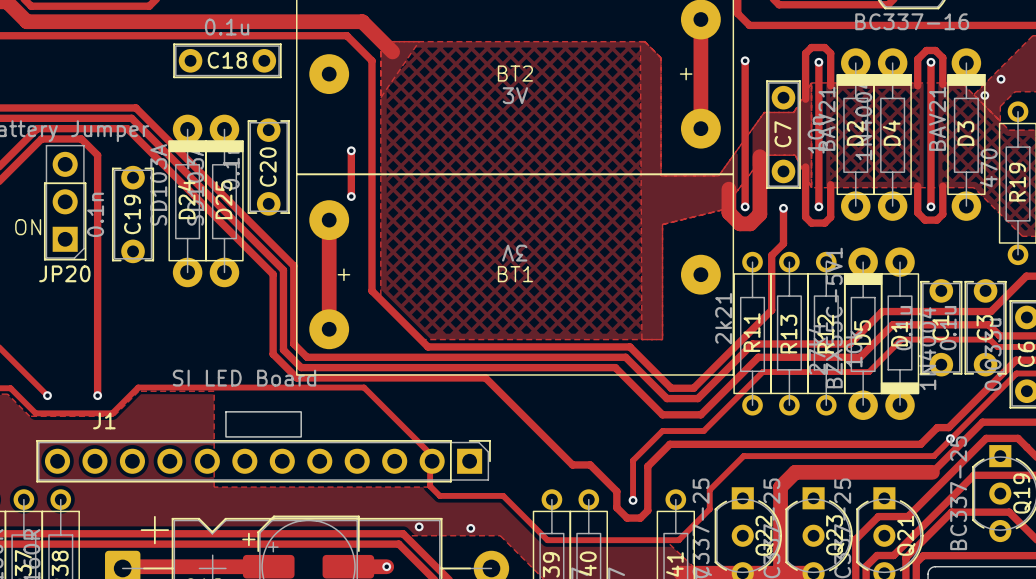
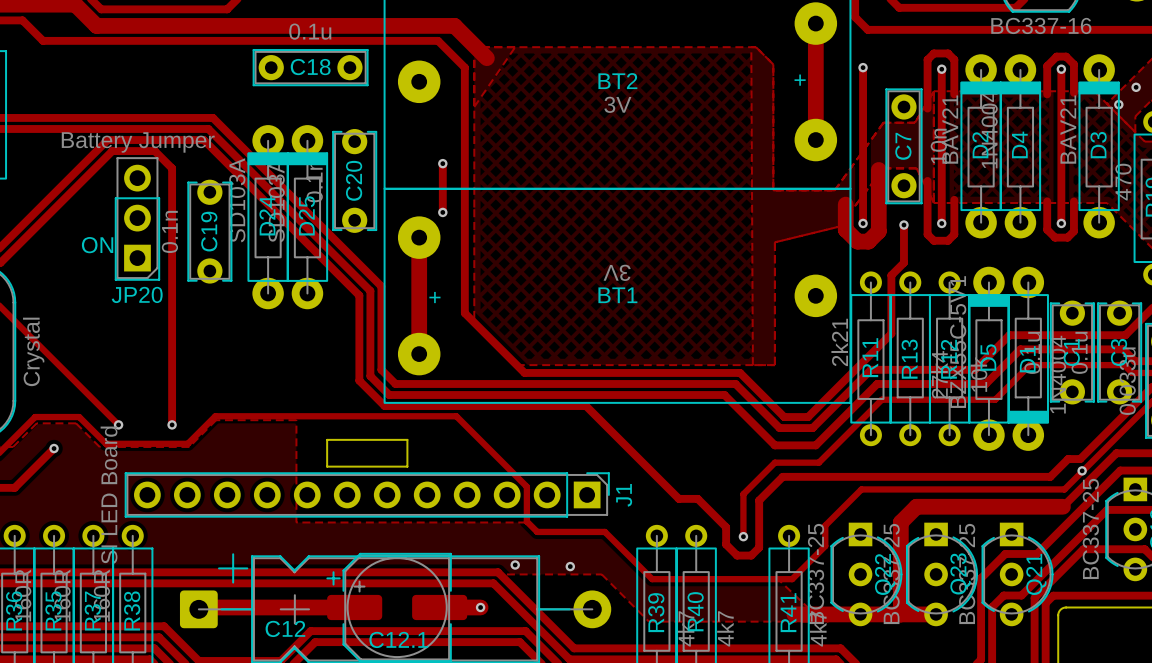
J1 value position: SI LED Board (244, 378) -> SI LED Board (109, 495)
board edge: none -> (327, 439) (407, 439) (407, 466) (327, 466) (327, 439)
J1 footprint: [36, 411, 491, 483] -> [124, 472, 610, 518]
J1 name position: J1 (104, 420) -> J1 (624, 495)

